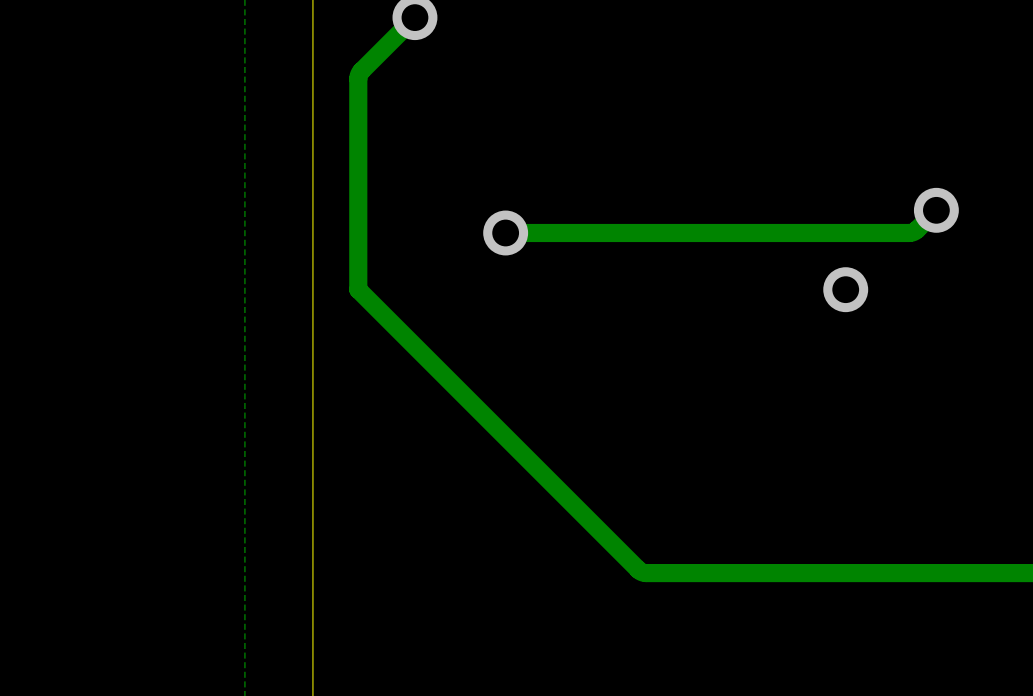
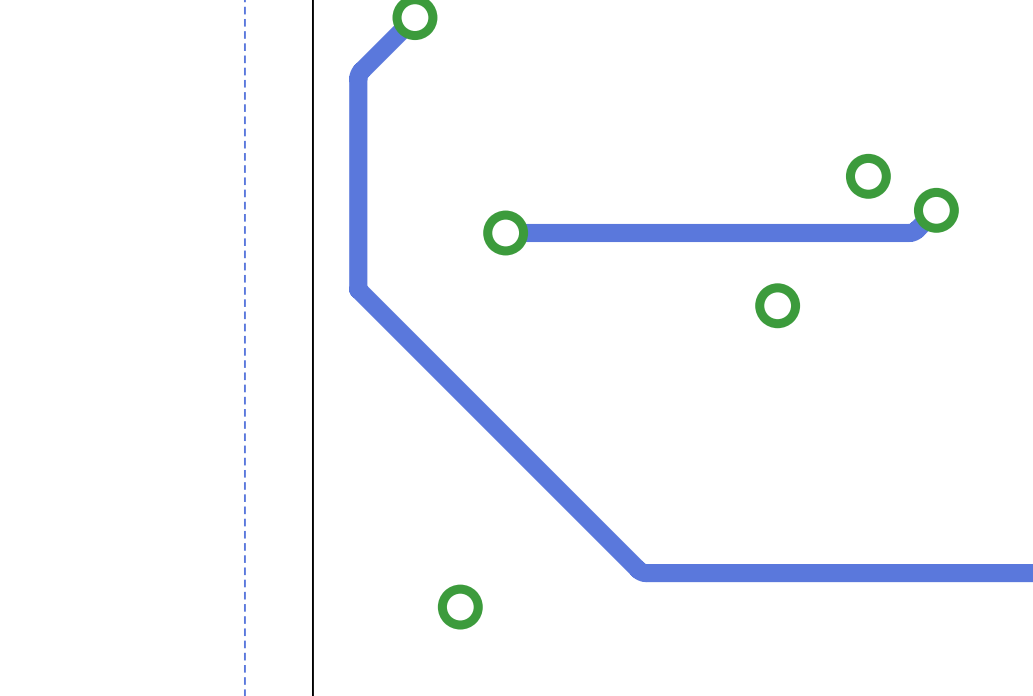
via: none -> (868, 176)
via: (845, 289) -> none
via: none -> (777, 305)
via: none -> (460, 607)

